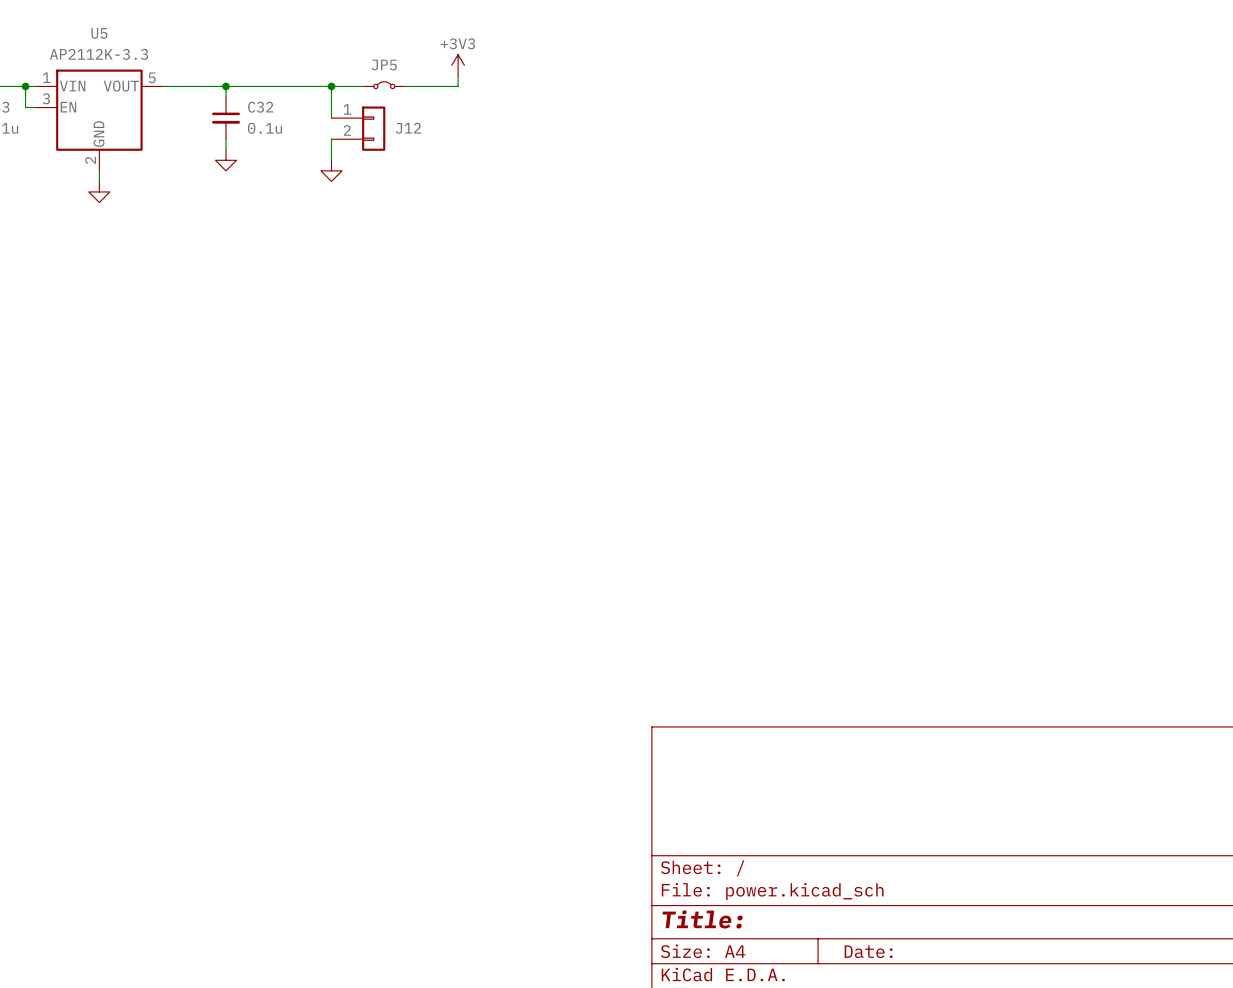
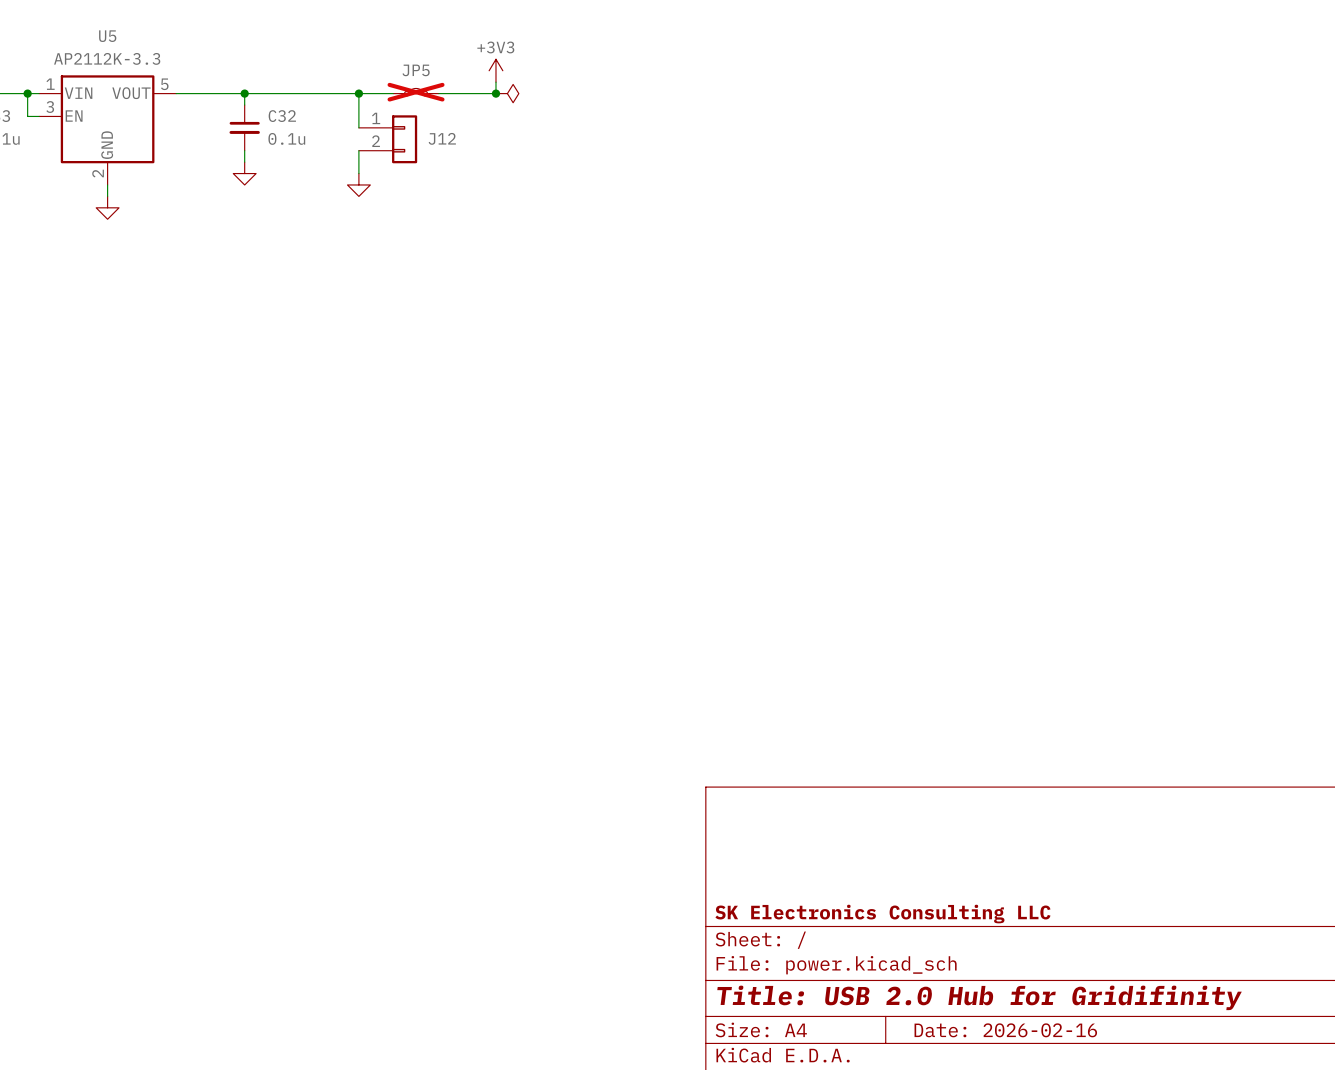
JP5 do-not-place cross: none -> (416, 92)
junction: none -> (495, 93)
power symbol: none -> (507, 93)
title block: none -> SK Electronics Consulting LLC (882, 914)
title block: Title: (702, 919) -> Title: USB 2.0 Hub for Gridifinity (979, 997)
title block: Date: (868, 951) -> Date: 2026-02-16 (1005, 1030)

